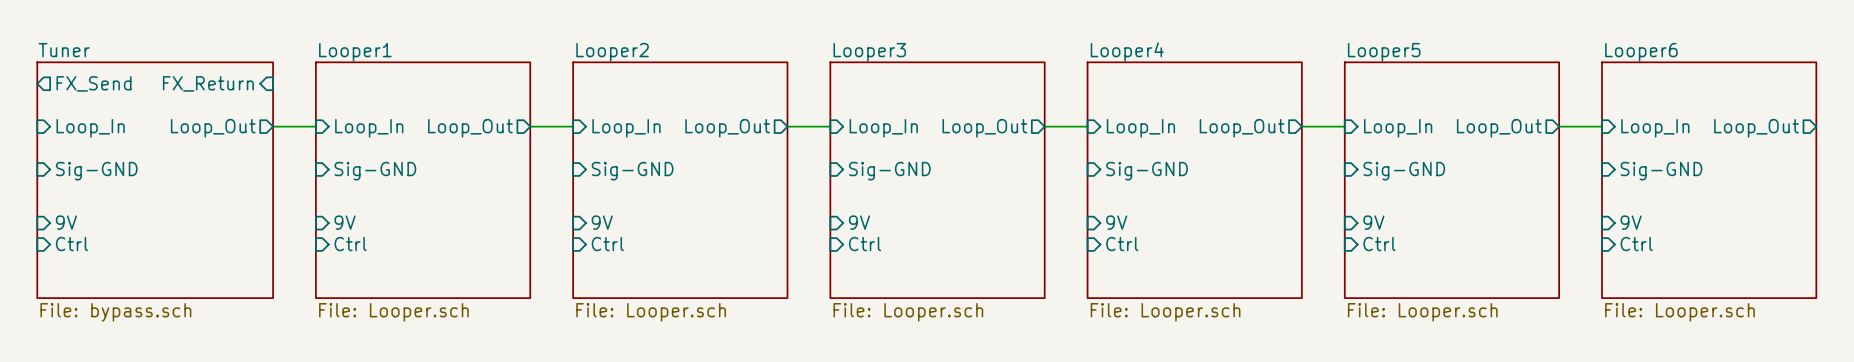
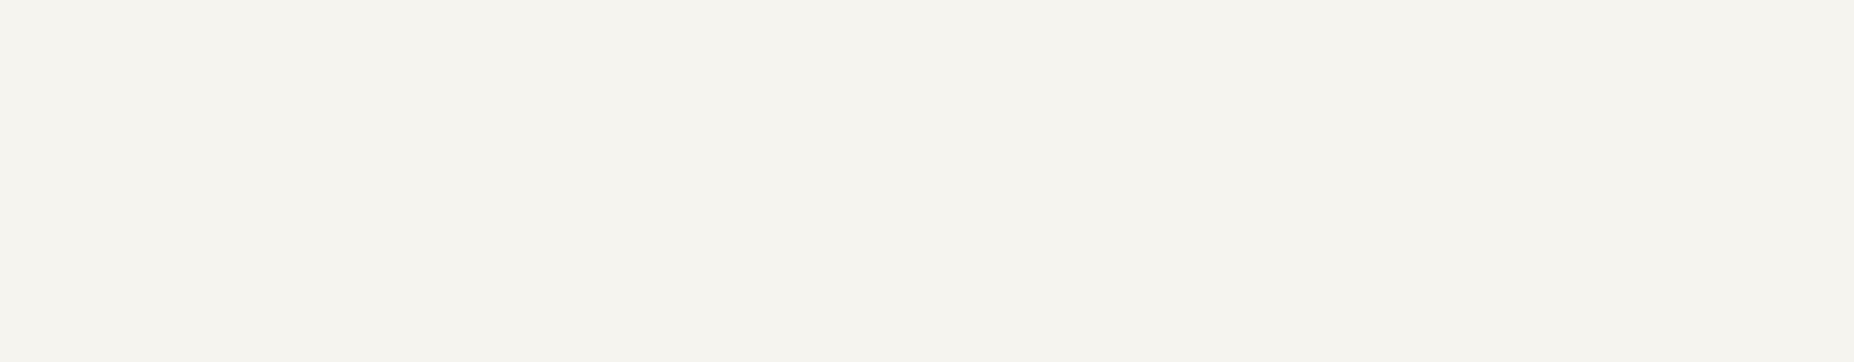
sheet pin: FX_Send (94, 83) -> none
sheet pin: FX_Return (208, 83) -> none
wire: (273, 126) (315, 126) -> none
wire: (530, 126) (573, 126) -> none
wire: (787, 126) (830, 126) -> none
wire: (1044, 126) (1087, 126) -> none
wire: (1301, 126) (1344, 126) -> none
wire: (1559, 126) (1601, 126) -> none
sheet pin: Loop_In (90, 128) -> none
sheet pin: Loop_Out (213, 128) -> none
sheet pin: Loop_In (369, 128) -> none
sheet pin: Loop_Out (470, 128) -> none
sheet pin: Loop_In (626, 128) -> none
sheet pin: Loop_Out (727, 128) -> none
sheet pin: Loop_In (883, 128) -> none
sheet pin: Loop_Out (984, 128) -> none
sheet pin: Loop_In (1140, 128) -> none
sheet pin: Loop_Out (1242, 128) -> none
sheet pin: Loop_In (1398, 128) -> none
sheet pin: Loop_Out (1499, 128) -> none
sheet pin: Loop_In (1655, 128) -> none
sheet pin: Loop_Out (1756, 128) -> none
sheet pin: Sig-GND (96, 171) -> none
sheet pin: Sig-GND (375, 171) -> none
sheet pin: Sig-GND (632, 171) -> none
sheet pin: Sig-GND (889, 171) -> none
sheet pin: Sig-GND (1147, 171) -> none
sheet pin: Sig-GND (1404, 171) -> none
sheet pin: Sig-GND (1661, 171) -> none
sheet Tuner: File: bypass.sch (155, 180) -> none
sheet Looper1: File: Looper.sch (423, 180) -> none
sheet Looper2: File: Looper.sch (680, 180) -> none
sheet Looper3: File: Looper.sch (937, 180) -> none
sheet Looper4: File: Looper.sch (1194, 180) -> none
sheet Looper5: File: Looper.sch (1451, 180) -> none
sheet Looper6: File: Looper.sch (1709, 180) -> none
sheet pin: 9V (66, 222) -> none
sheet pin: 9V (345, 222) -> none
sheet pin: 9V (602, 222) -> none
sheet pin: 9V (859, 222) -> none
sheet pin: 9V (1116, 222) -> none
sheet pin: 9V (1373, 222) -> none
sheet pin: 9V (1631, 222) -> none
sheet pin: Ctrl (71, 244) -> none
sheet pin: Ctrl (350, 244) -> none
sheet pin: Ctrl (607, 244) -> none
sheet pin: Ctrl (865, 244) -> none
sheet pin: Ctrl (1122, 244) -> none
sheet pin: Ctrl (1379, 244) -> none
sheet pin: Ctrl (1636, 244) -> none

